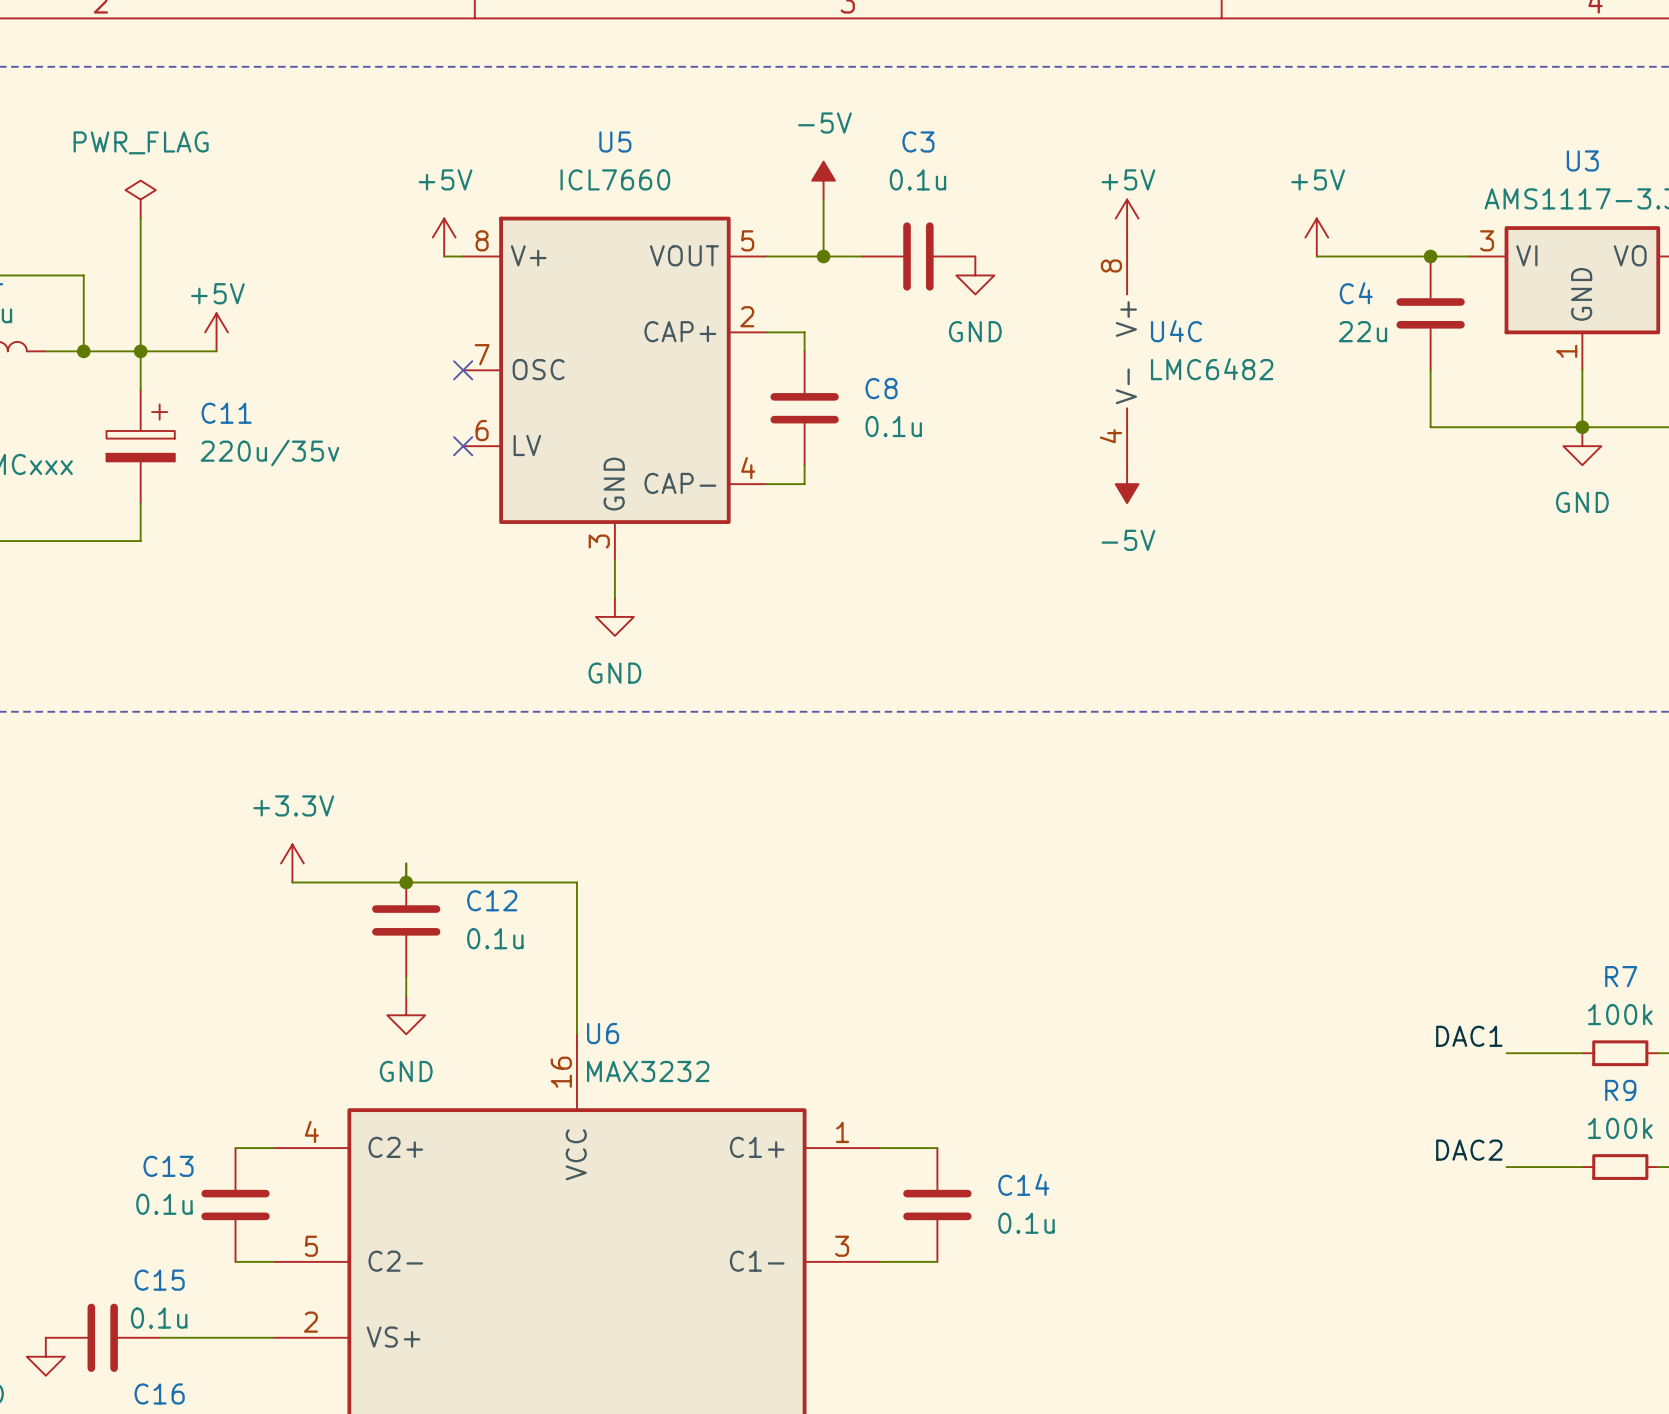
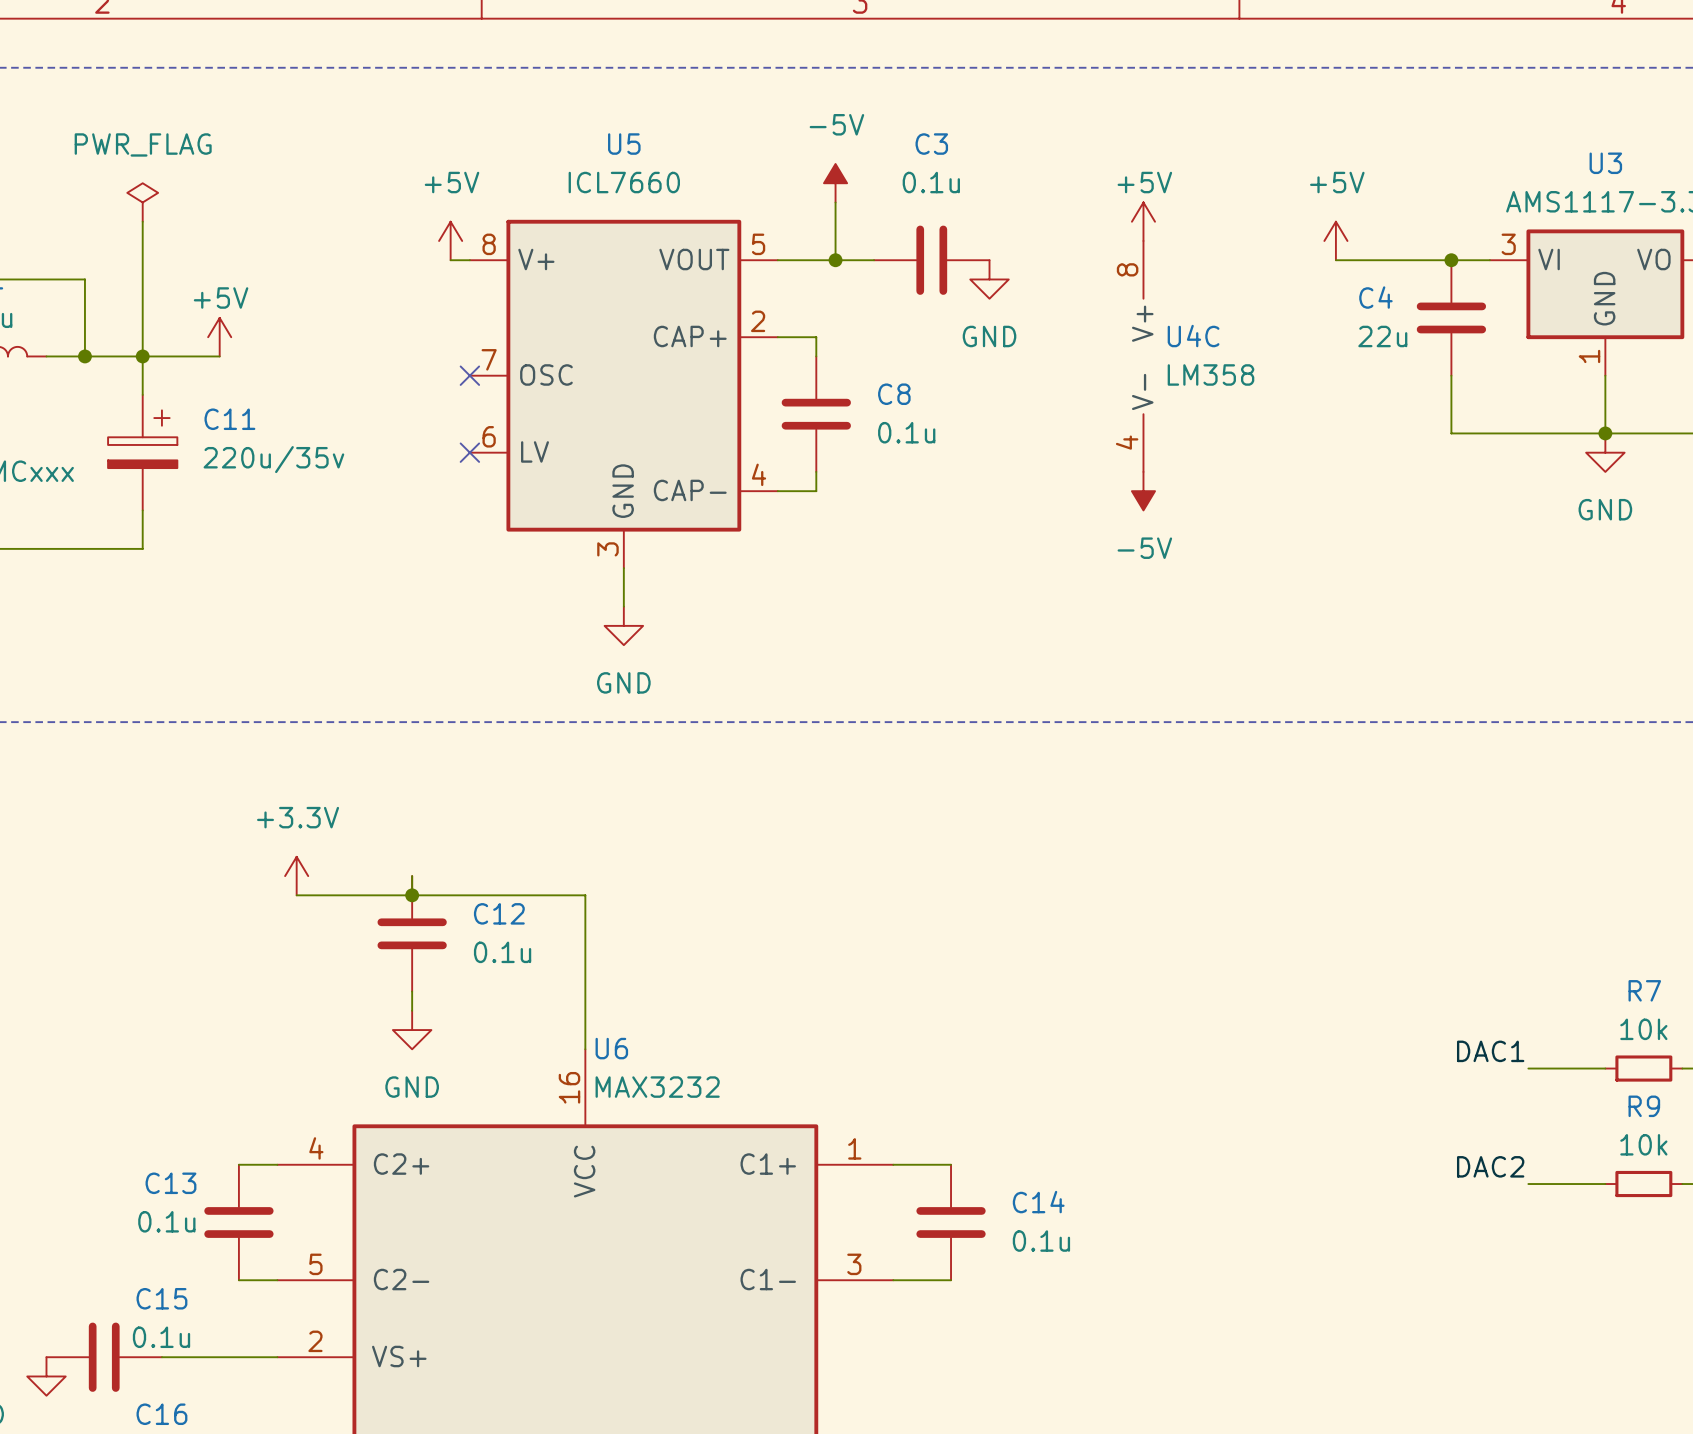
U4C value: LMC6482 (1212, 369) -> LM358 (1210, 374)
R7 value: 100k (1620, 1014) -> 10k (1643, 1029)
R9 value: 100k (1620, 1128) -> 10k (1643, 1144)

